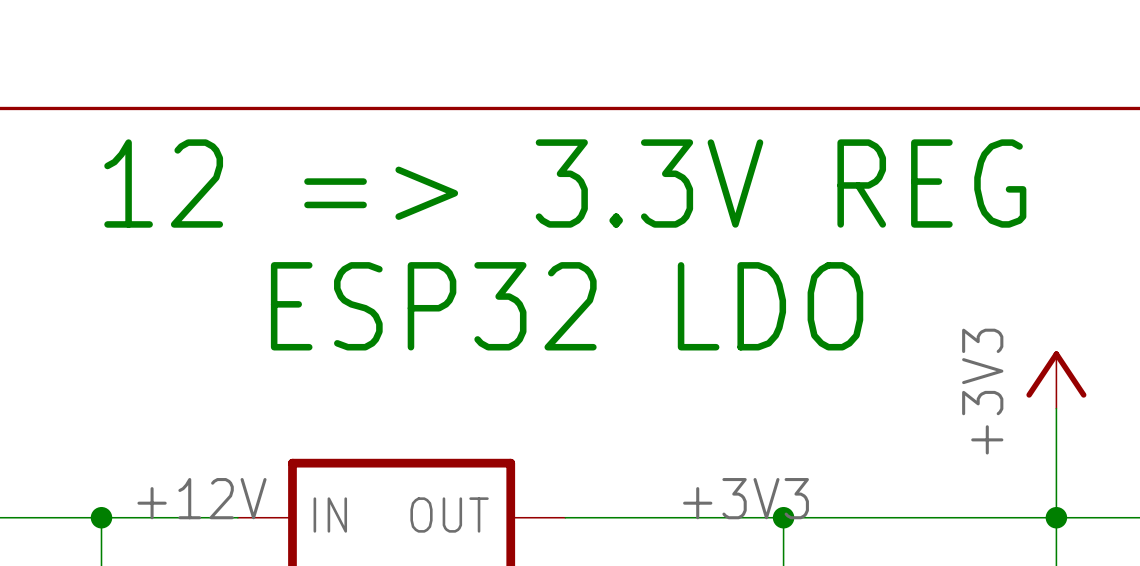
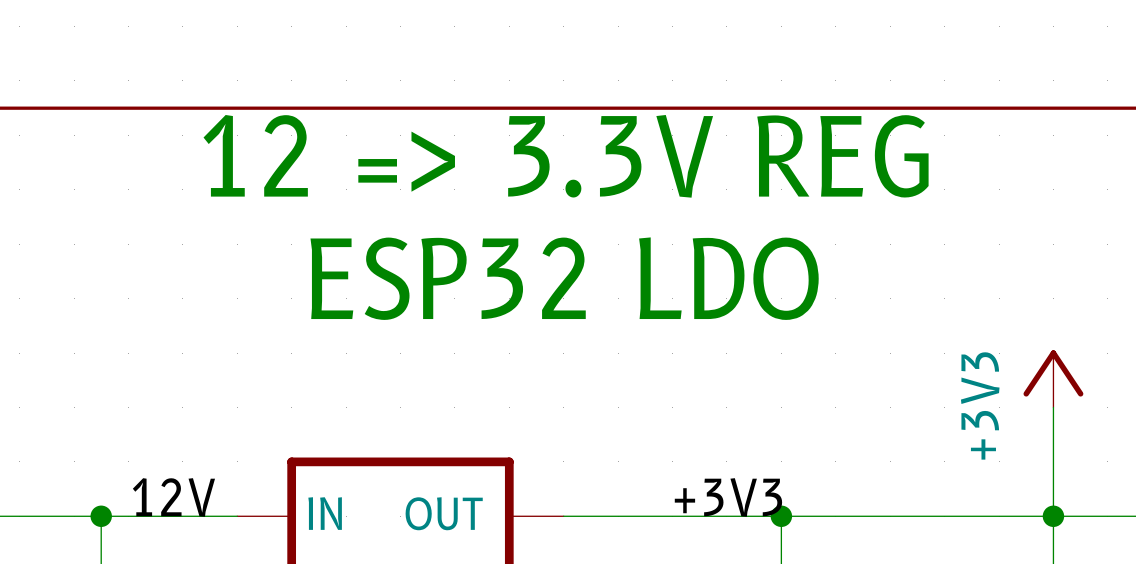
text position: 12 => 3.3V REG (565, 183) -> 12 => 3.3V REG (566, 156)
text position: ESP32 LDO (567, 306) -> ESP32 LDO (564, 278)
label: +12V (202, 498) -> 12V (173, 497)

